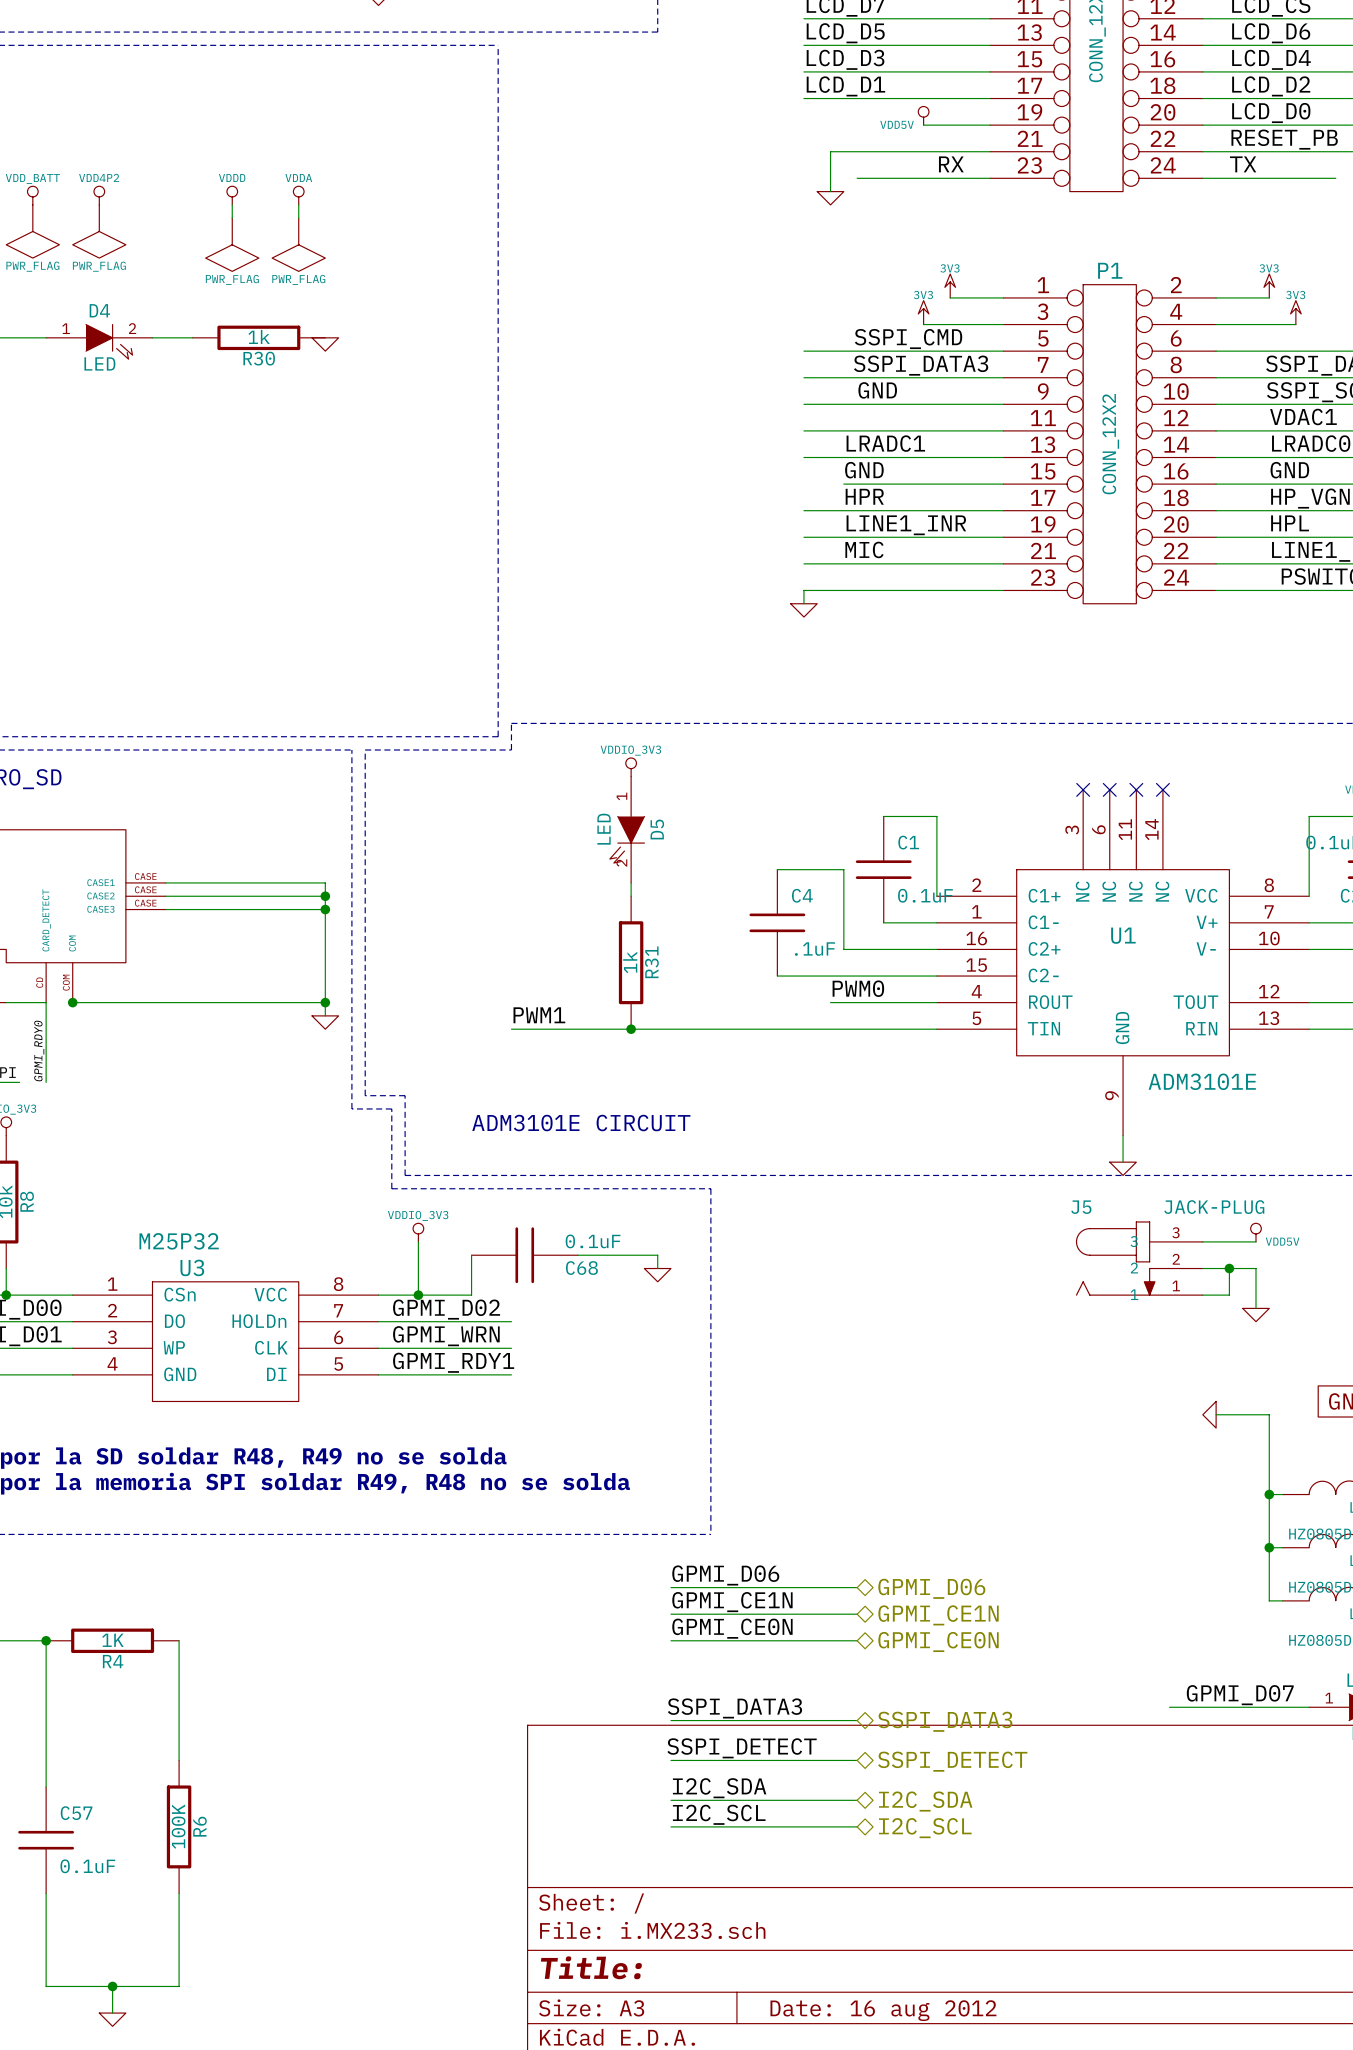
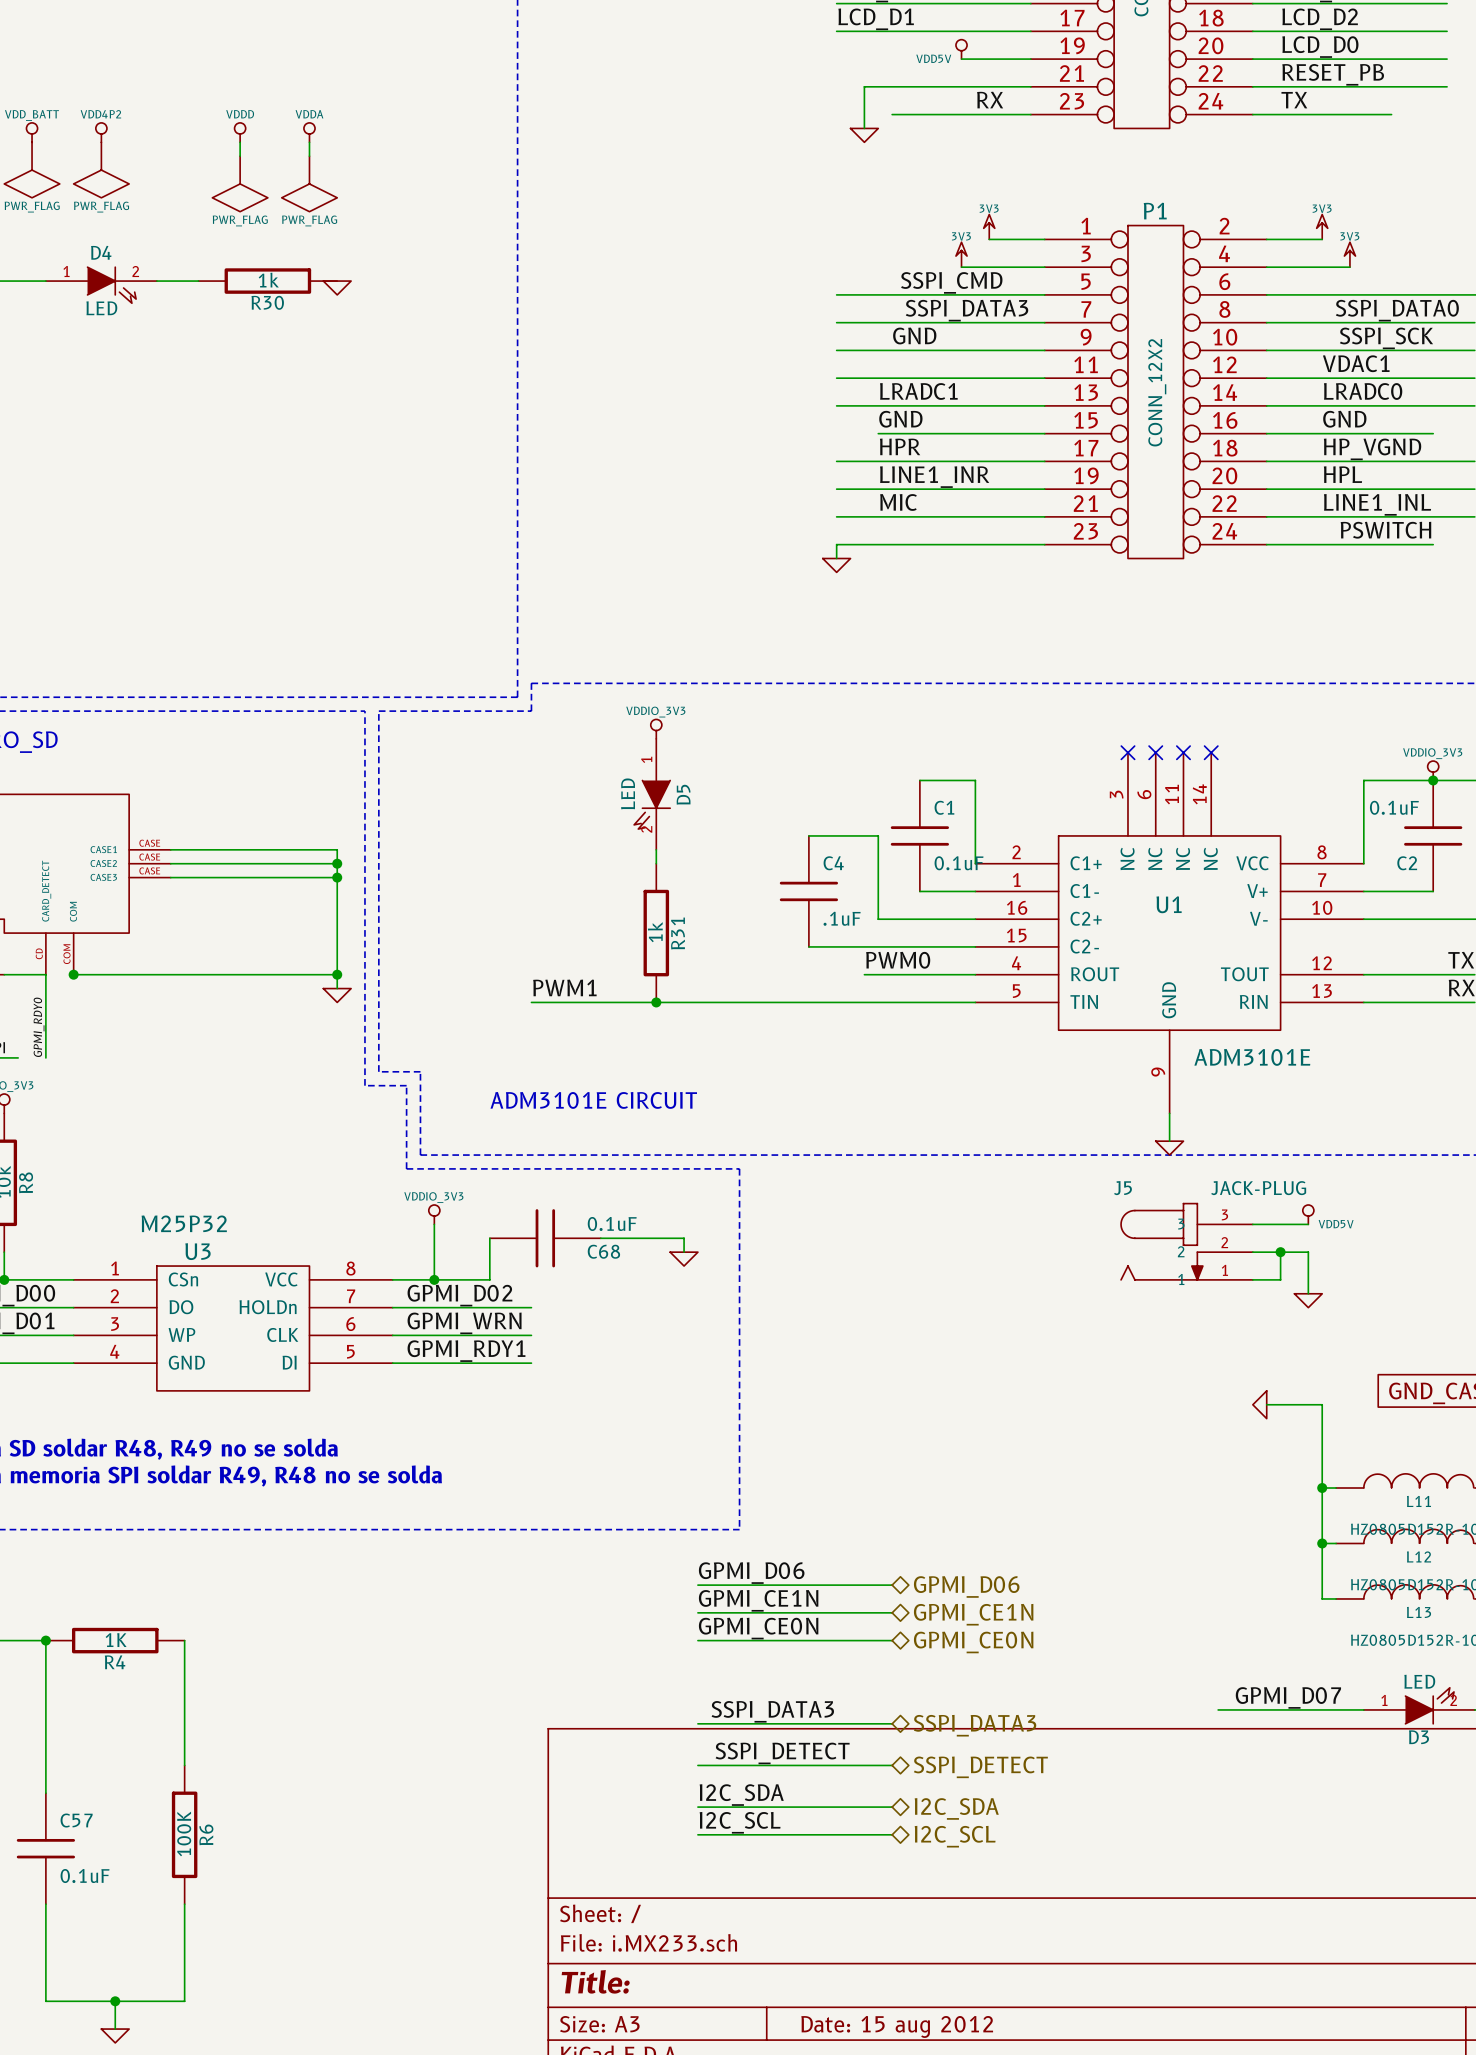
title block: Date: 16 aug 2012 (883, 2010) -> Date: 15 aug 2012 (897, 2026)

